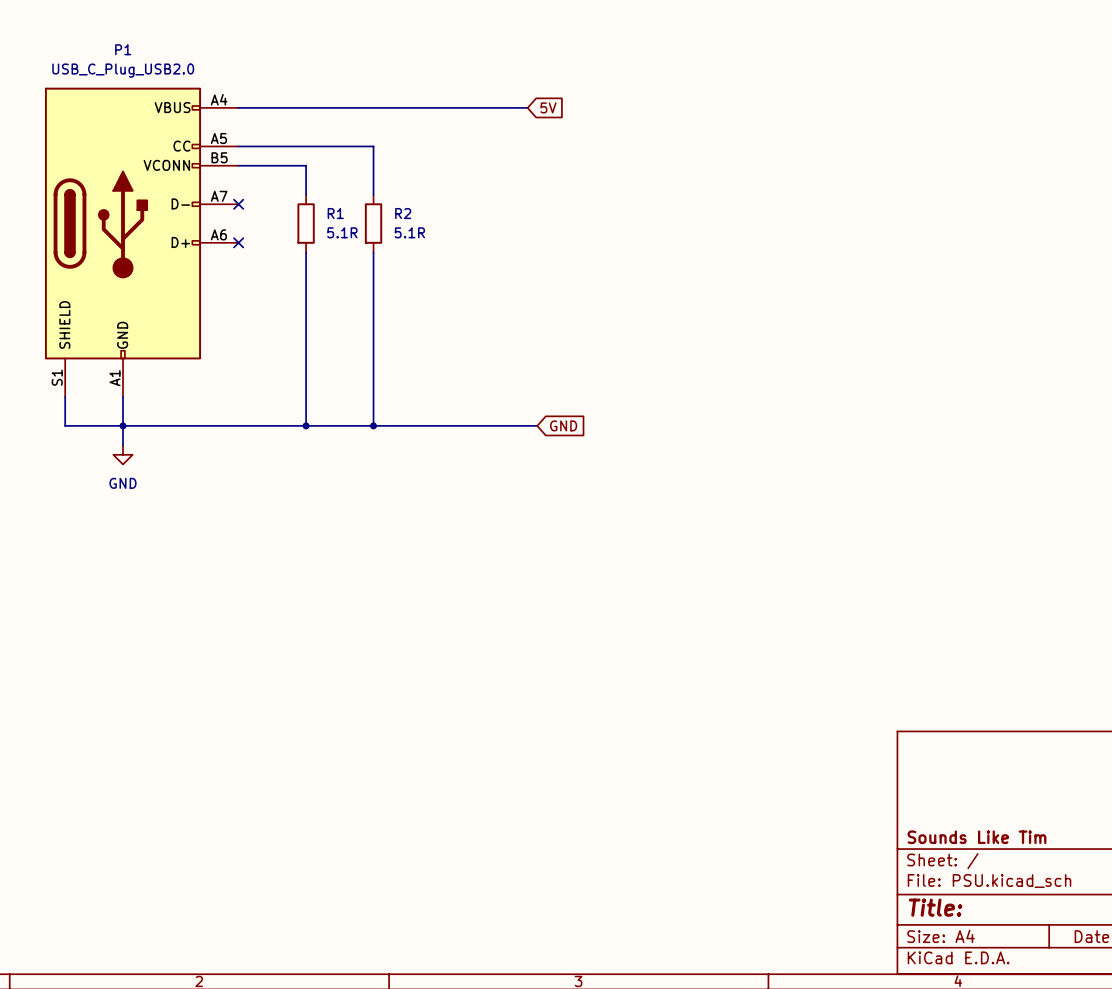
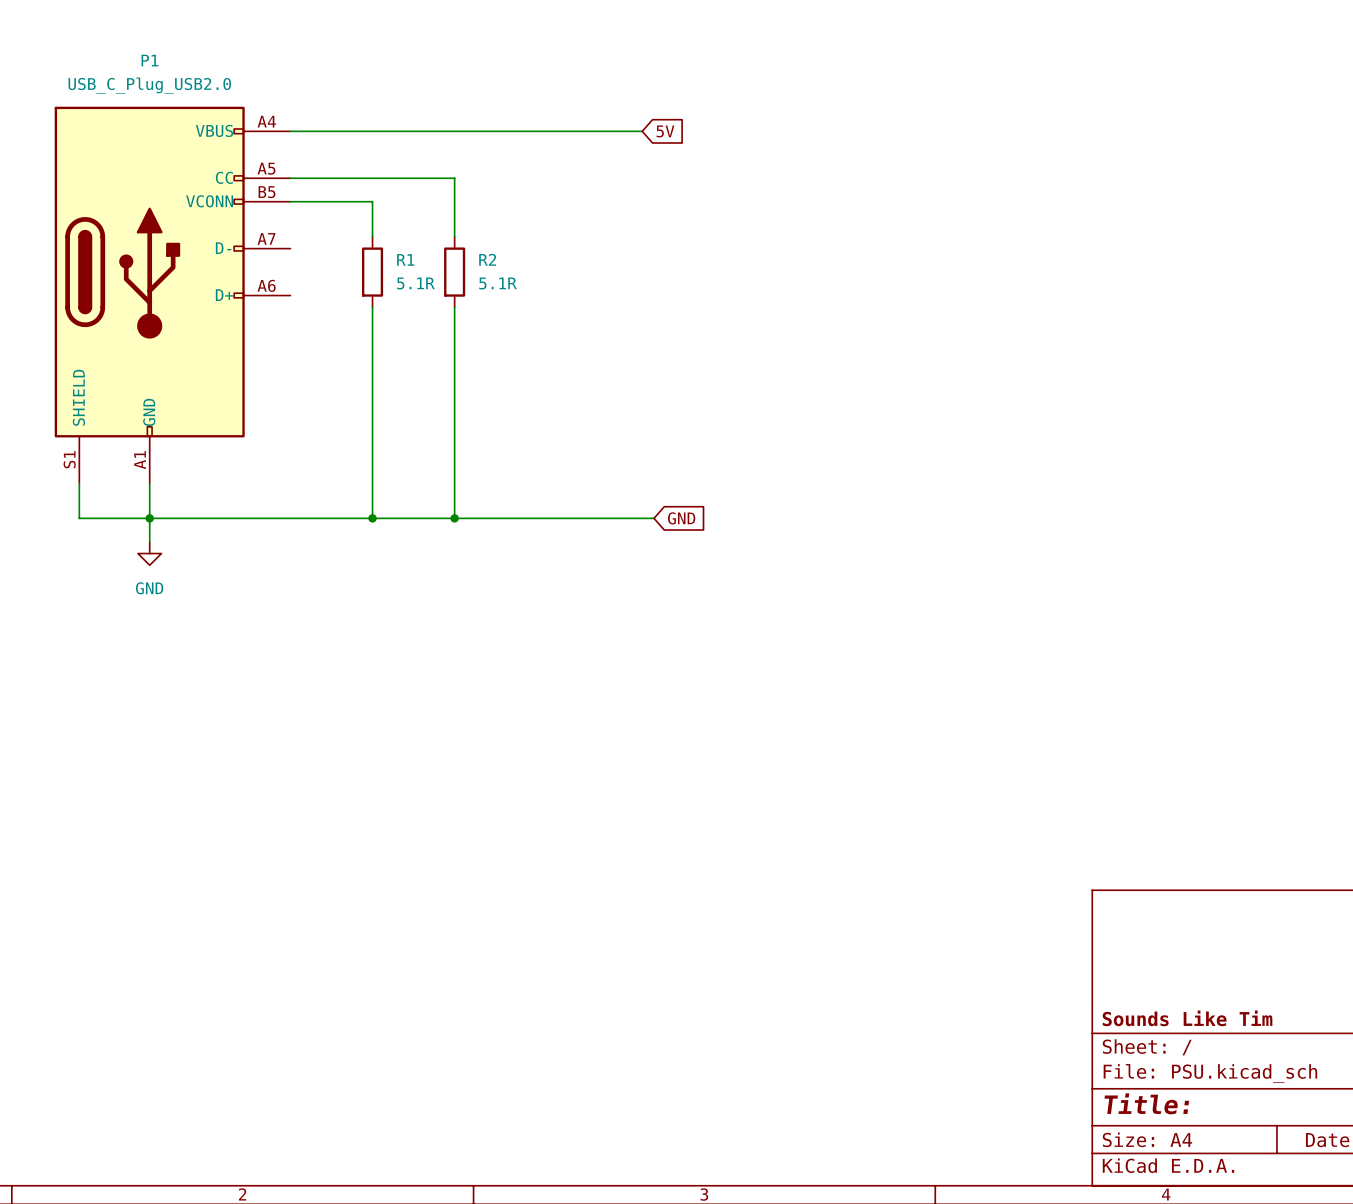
no-connect mark: (238, 204) -> none
no-connect mark: (238, 242) -> none

